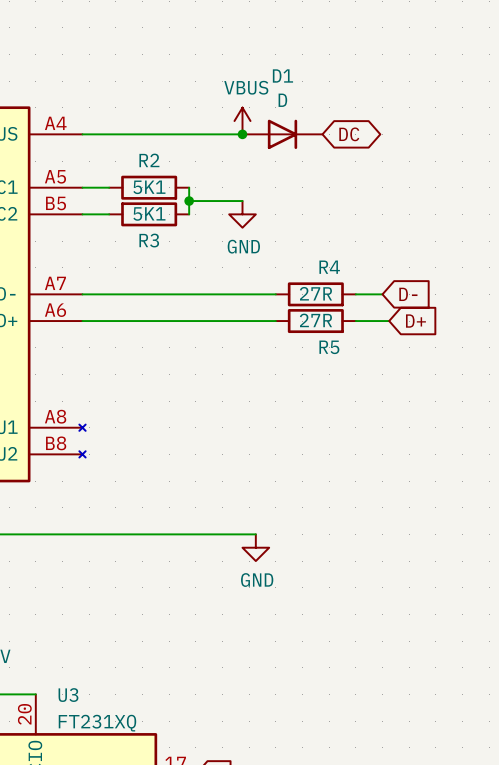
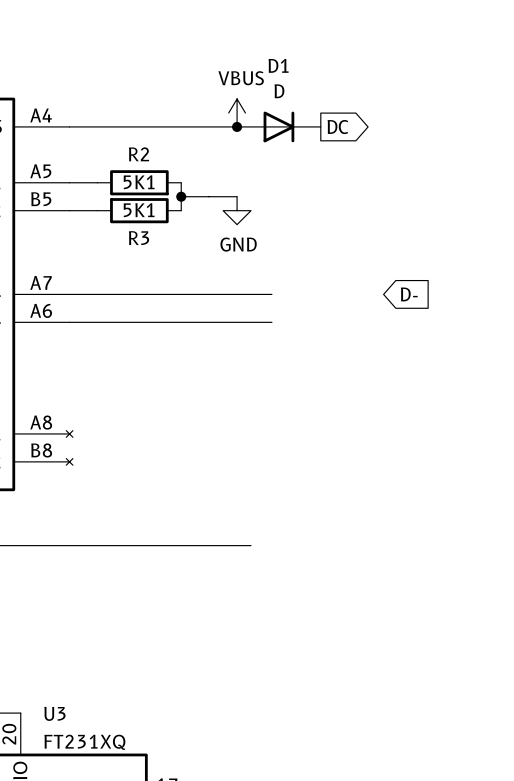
global label shape: bidirectional (349, 134) -> output (337, 127)
R4: 27R (315, 294) -> none
wire: (355, 294) (382, 294) -> none
R5: 27R (315, 321) -> none
wire: (355, 321) (389, 321) -> none
global label: D+ (415, 321) -> none
power symbol: GND (255, 547) -> none

